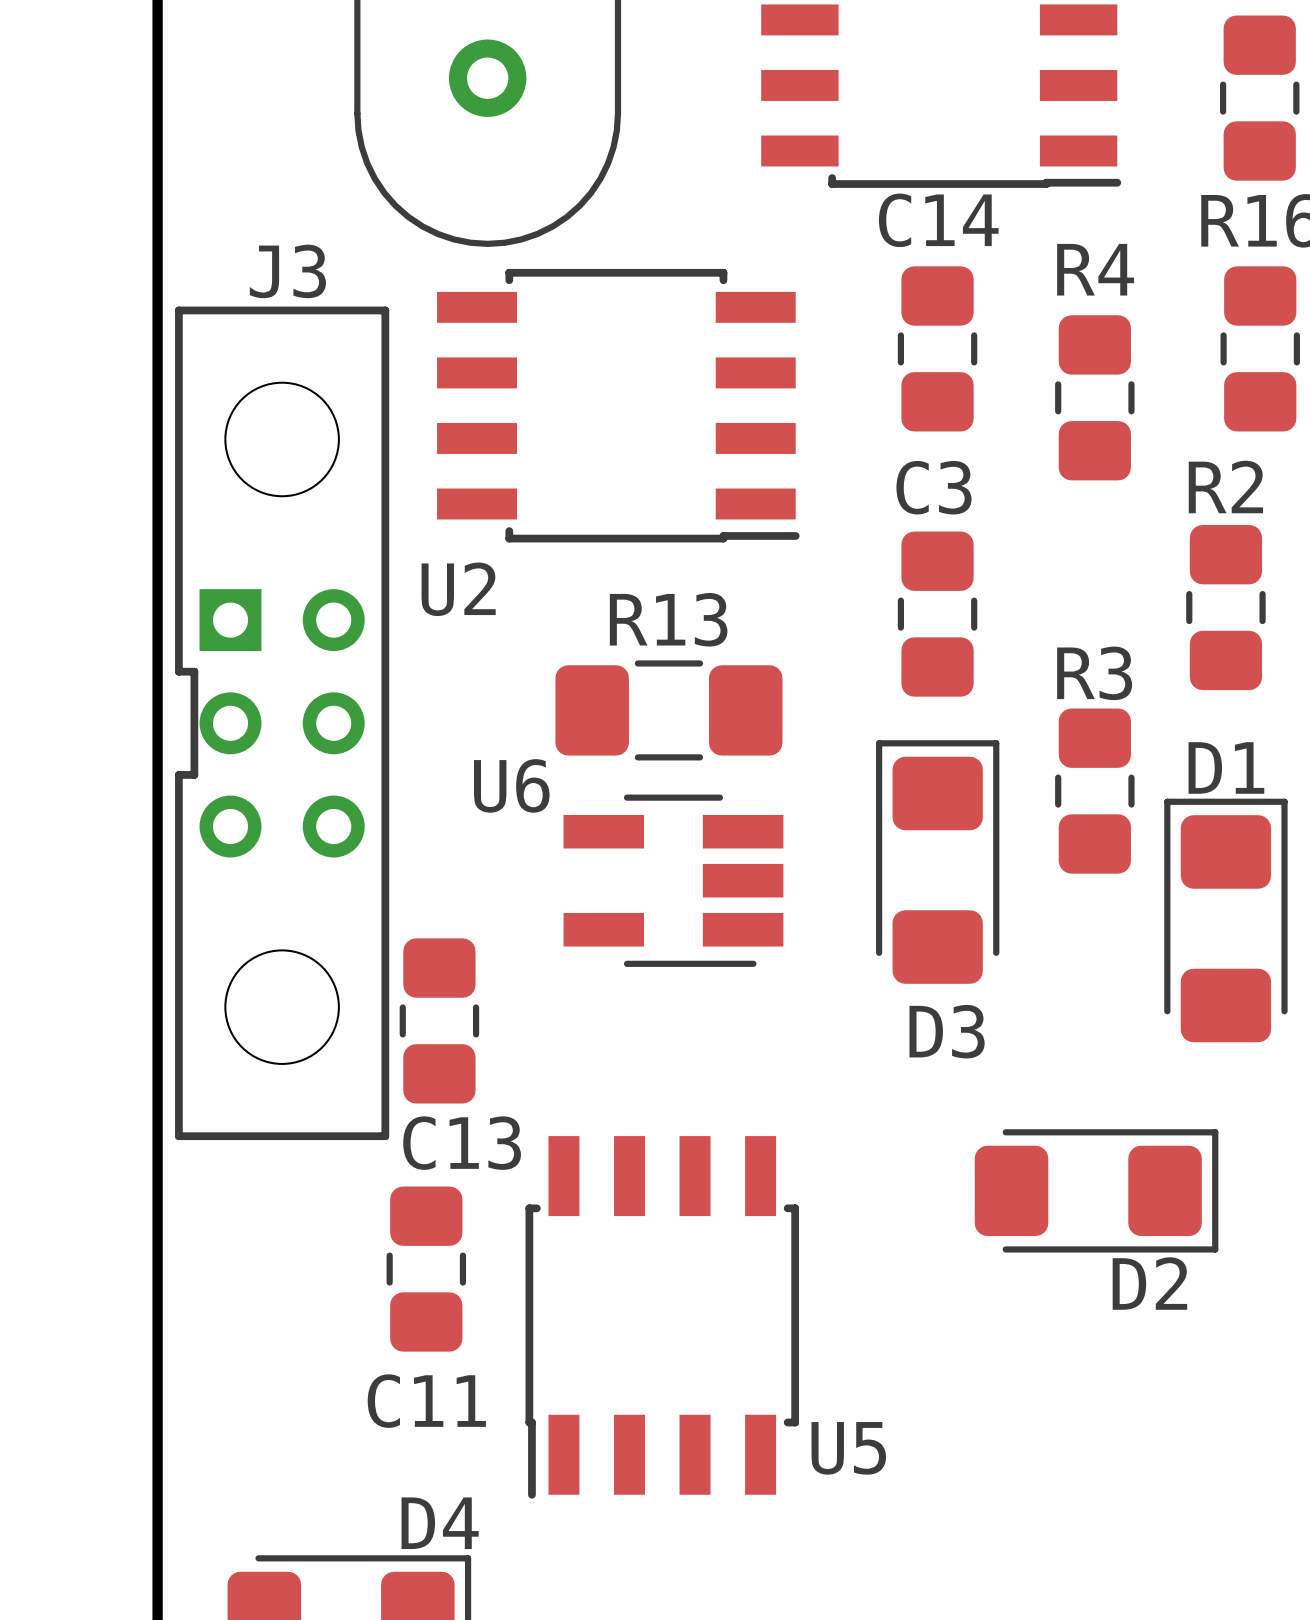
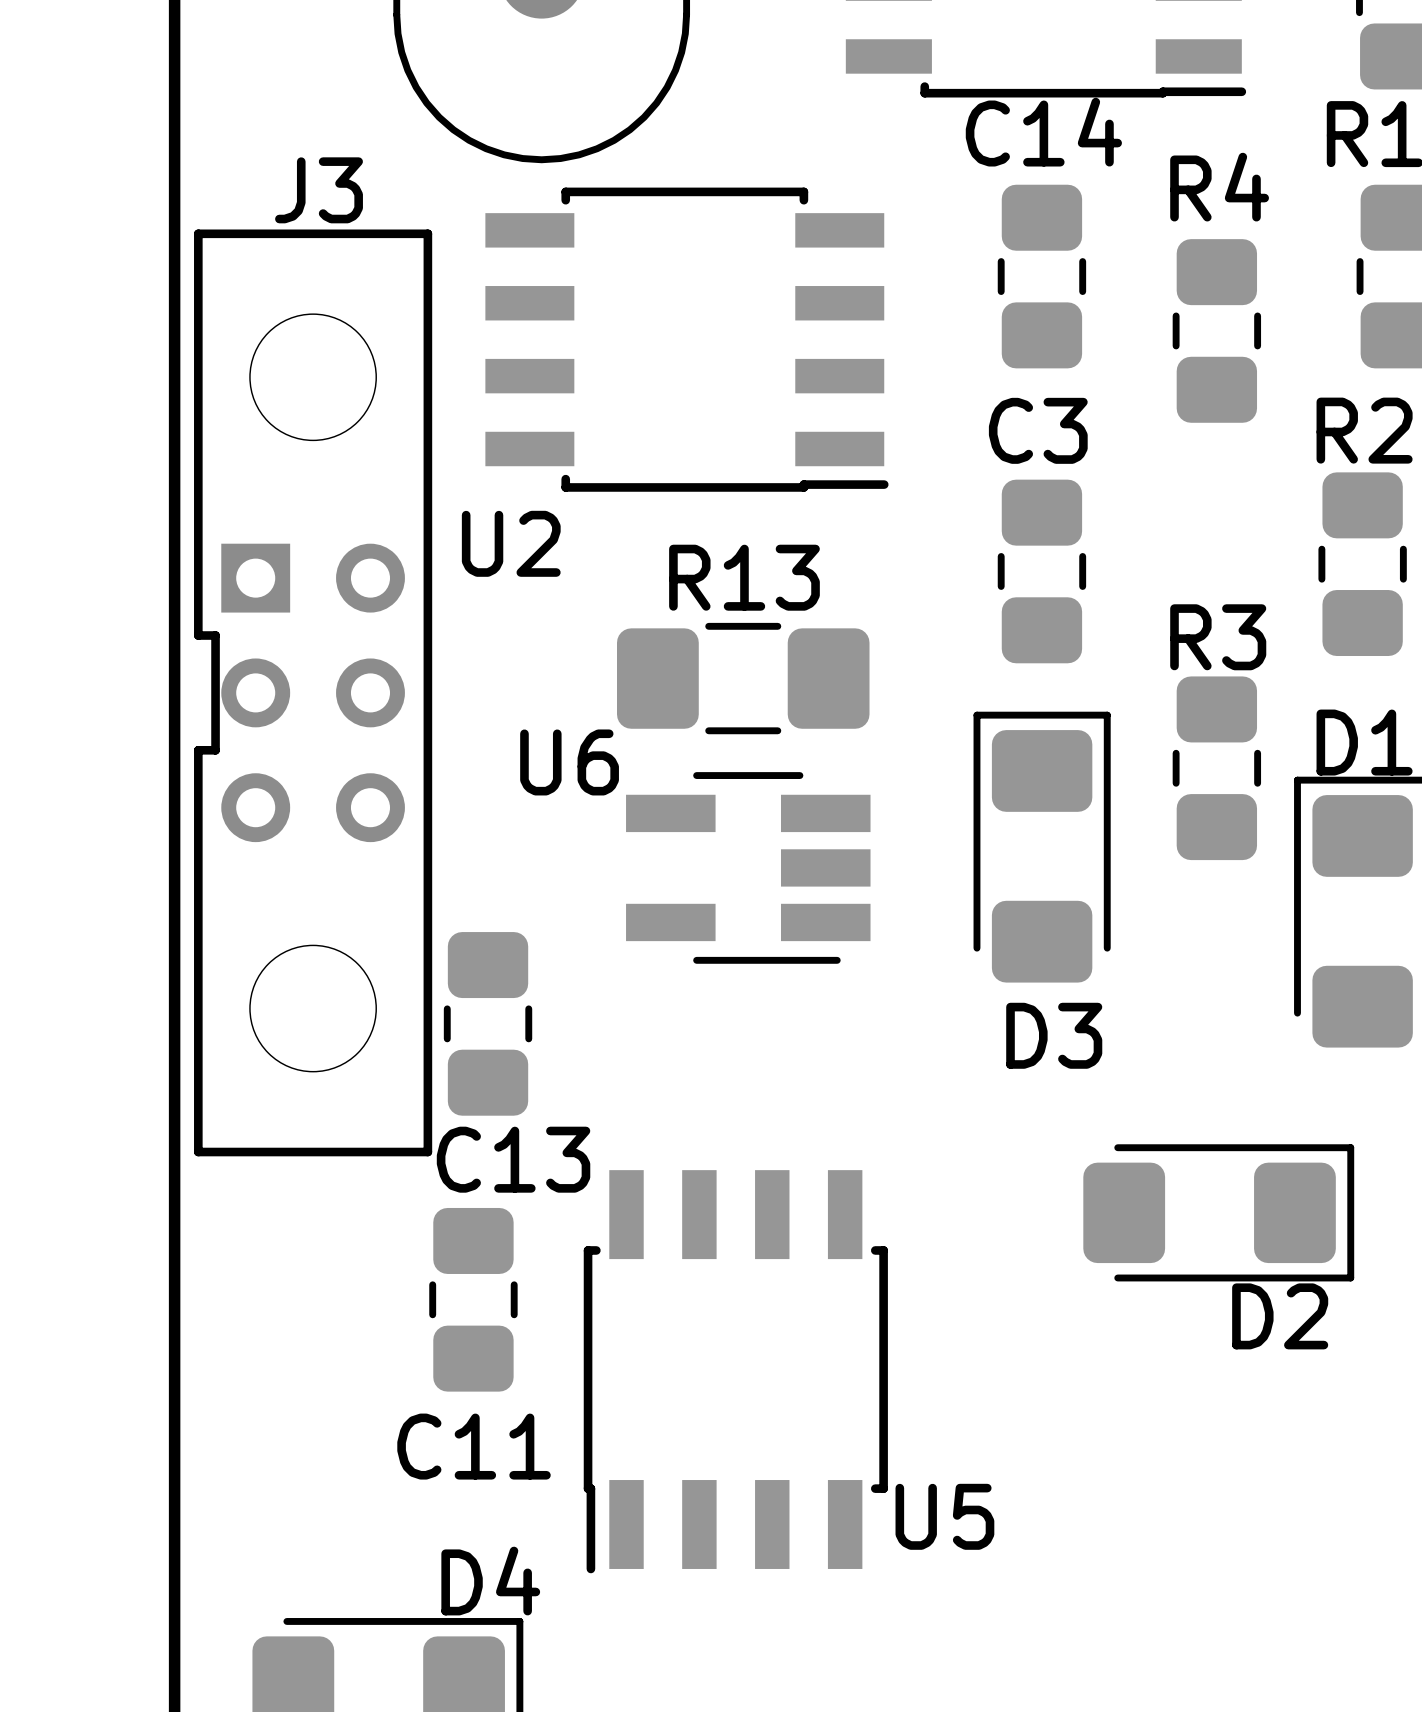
U5 position: (662, 1317) -> (735, 1371)

